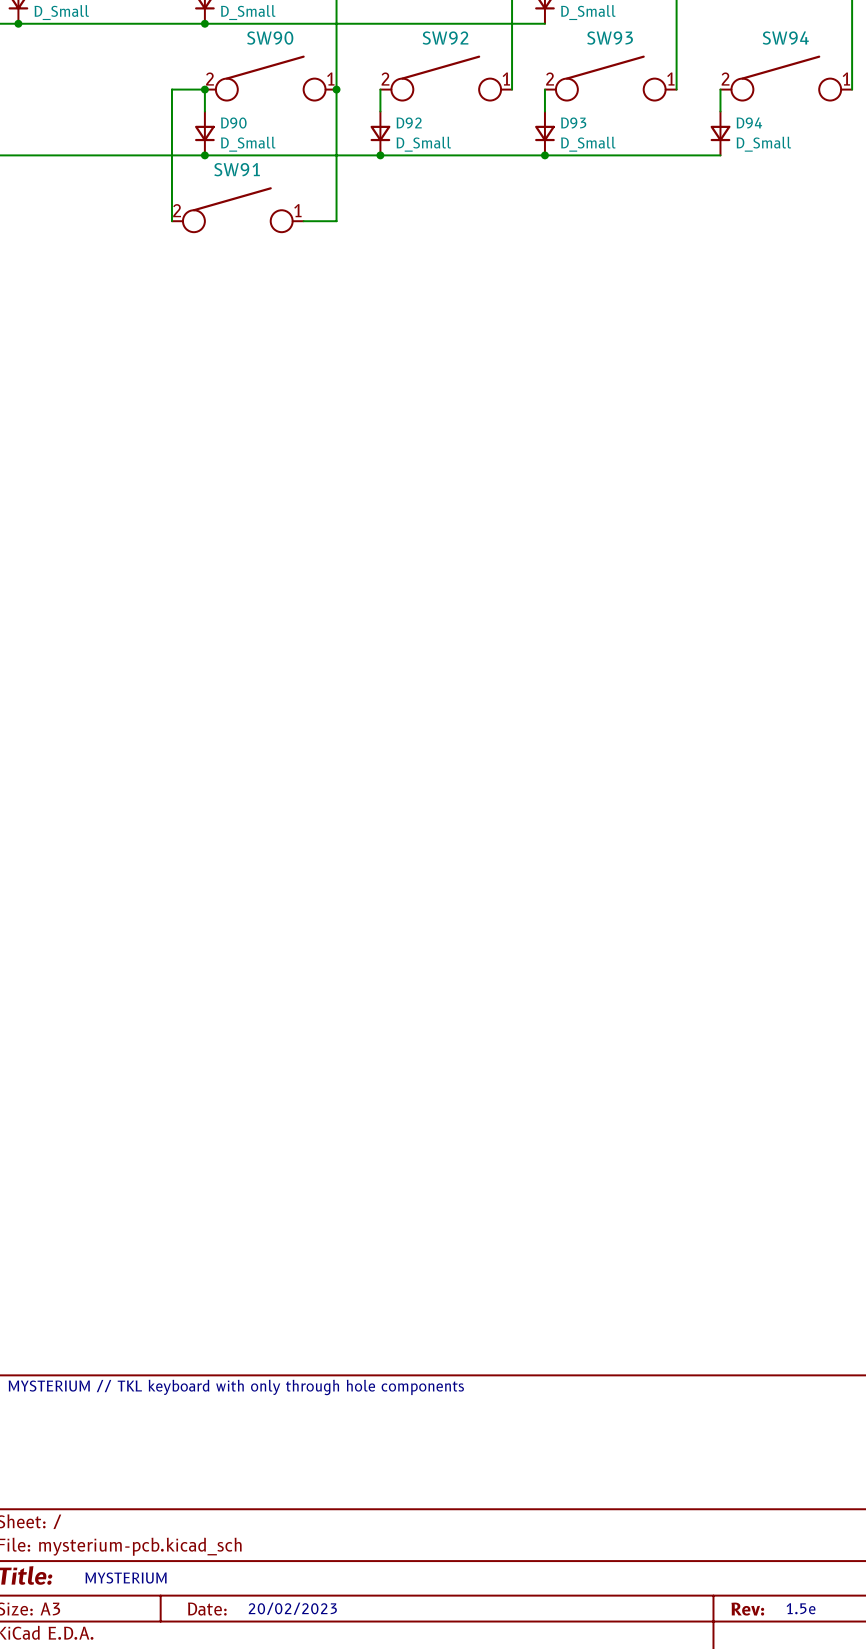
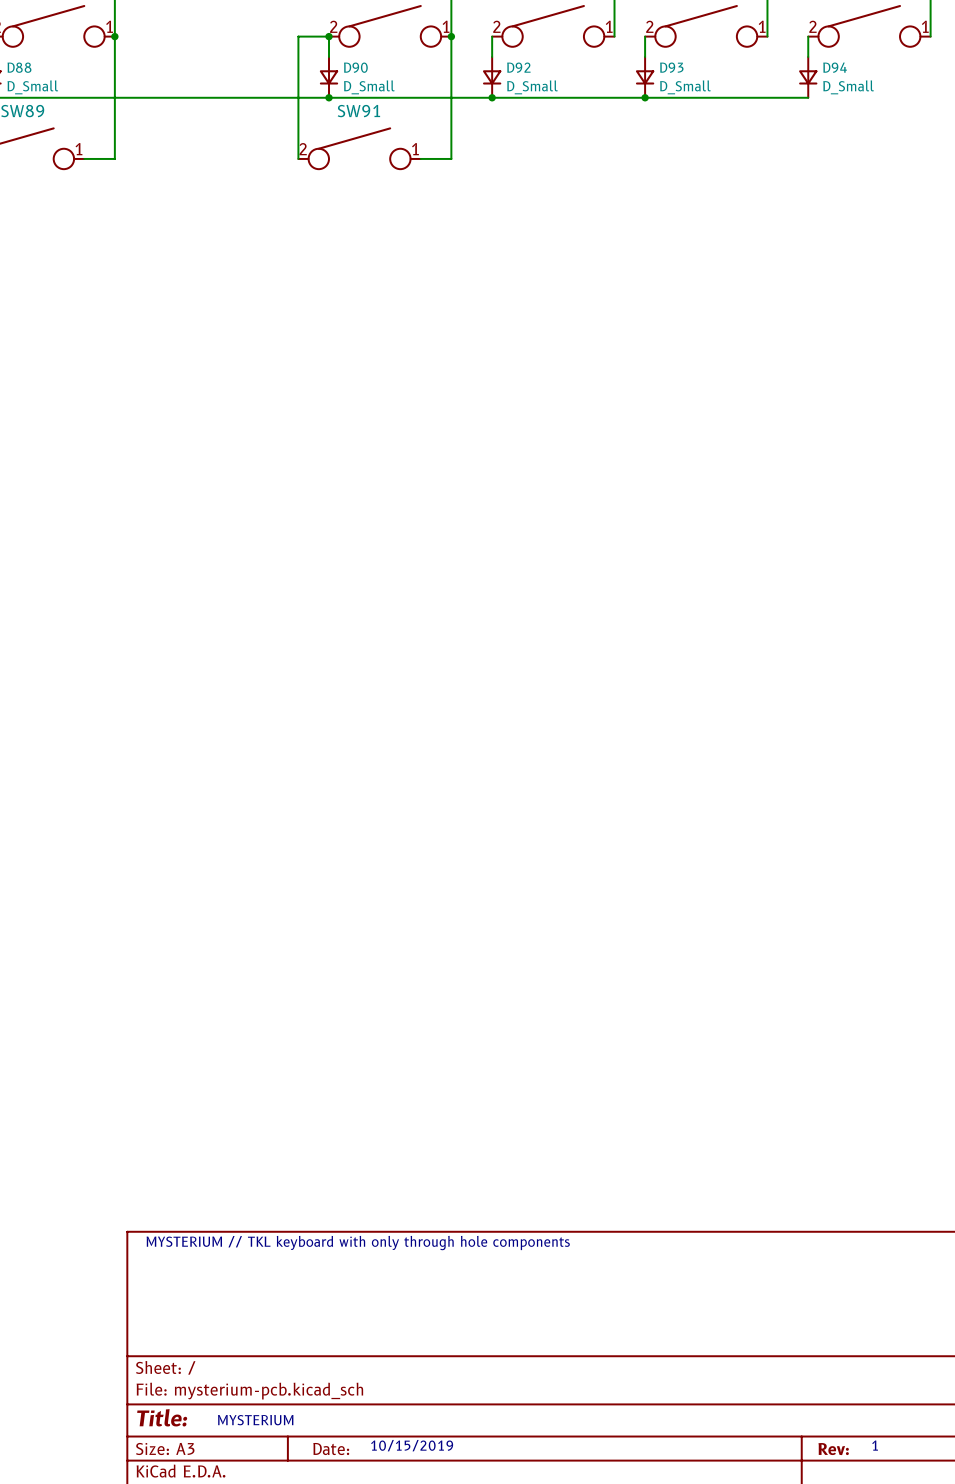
text: none -> 1 (875, 1445)
text: 20/02/2023 (292, 1608) -> 10/15/2019 (412, 1445)
text: 1.5e (801, 1608) -> none

